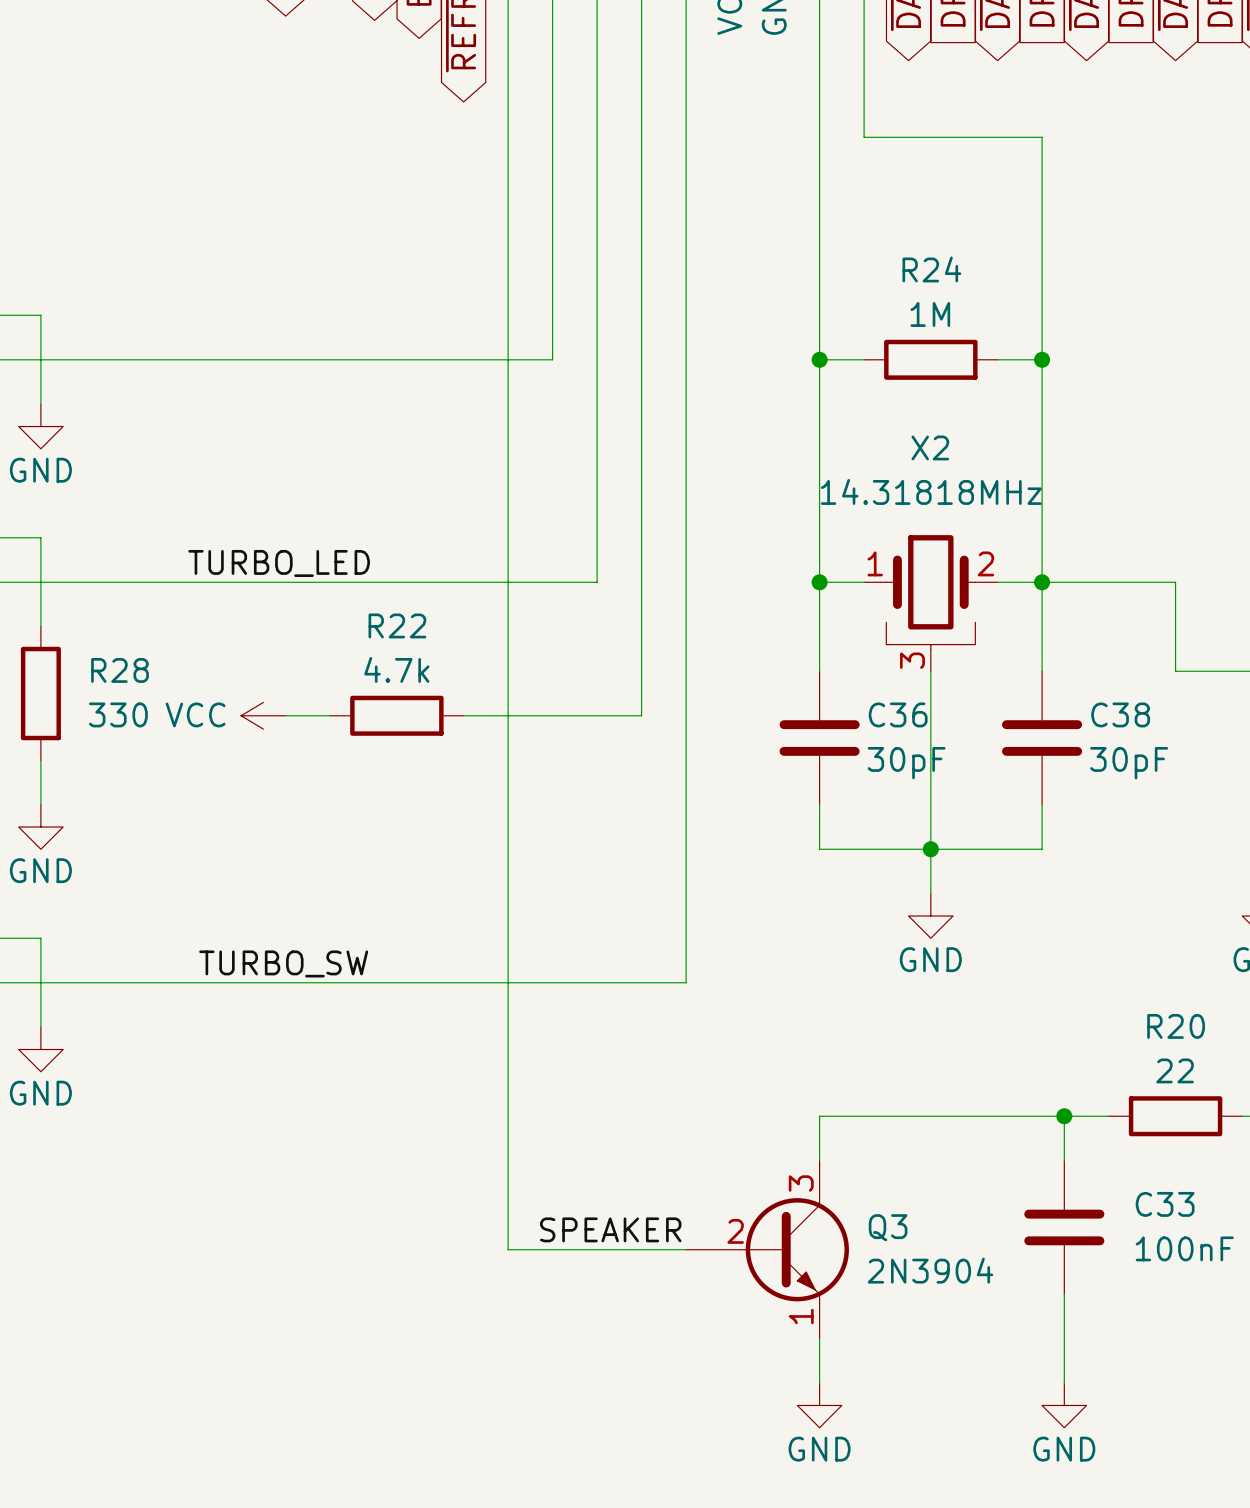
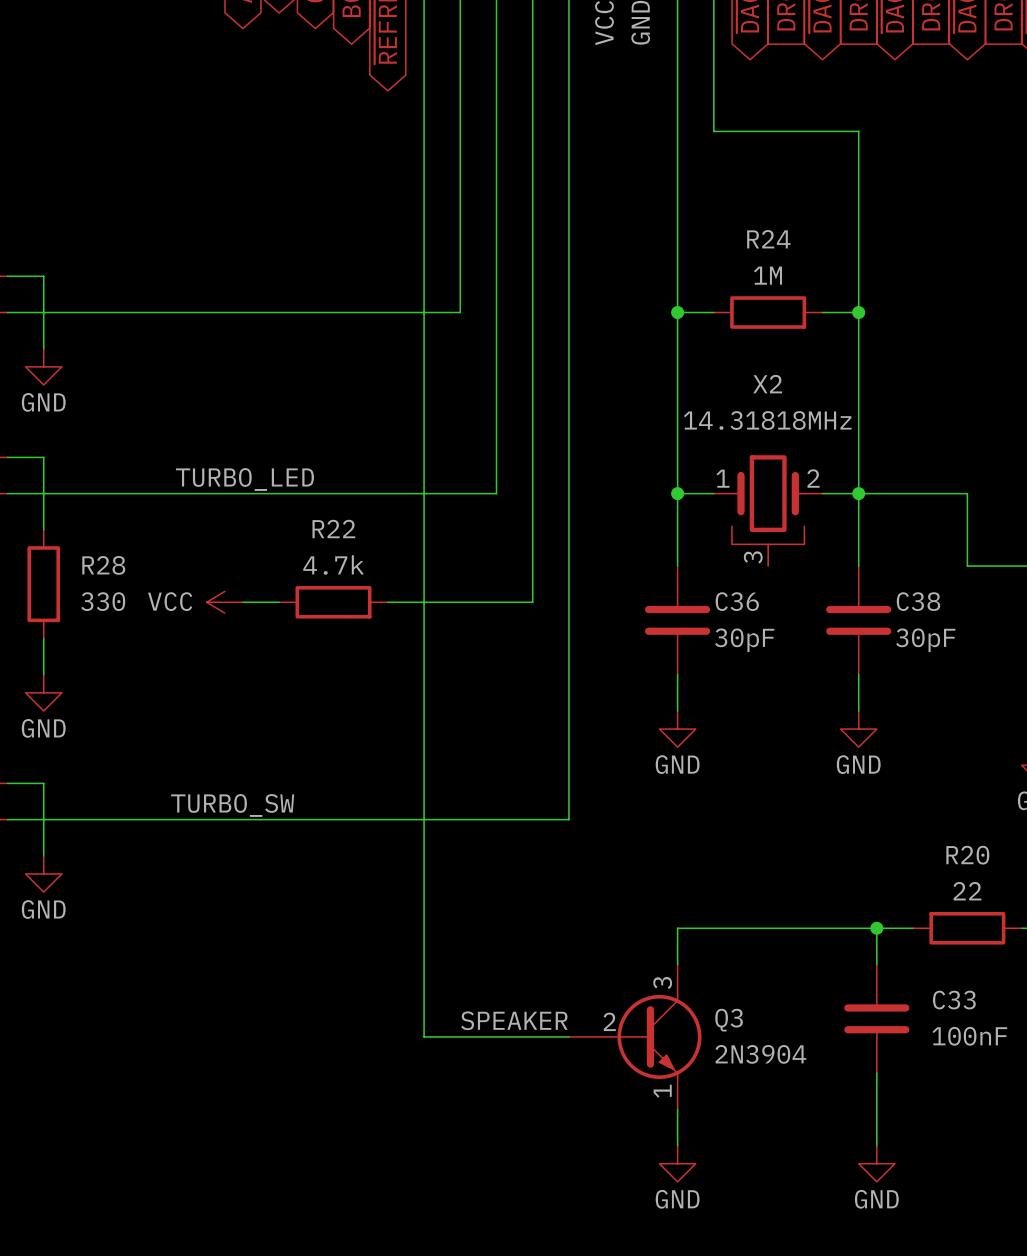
wire: (930, 671) (930, 893) -> none
wire: (819, 849) (1042, 849) -> none
junction: (930, 849) -> none
power symbol: none -> GND (677, 729)
power symbol: none -> GND (858, 729)
power symbol: GND (930, 916) -> none

